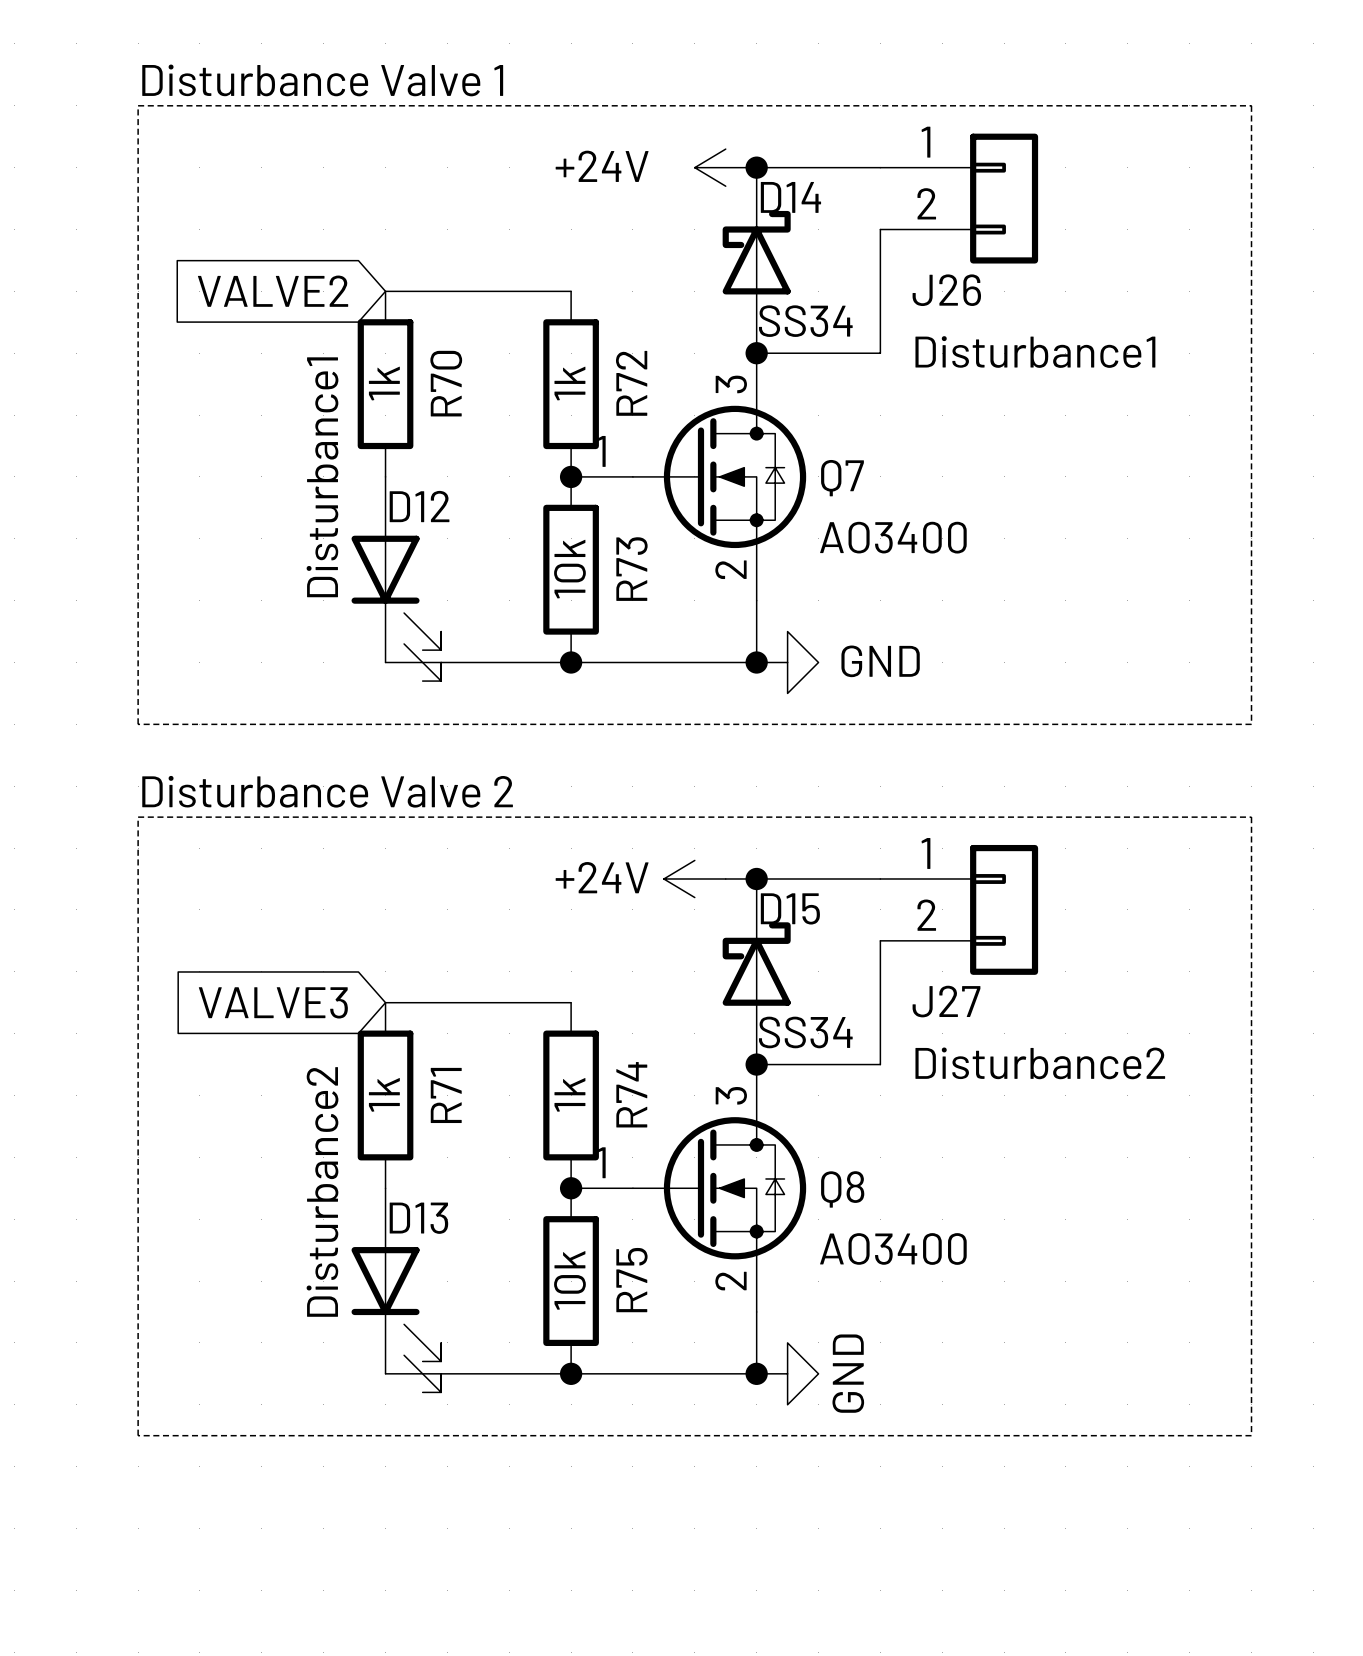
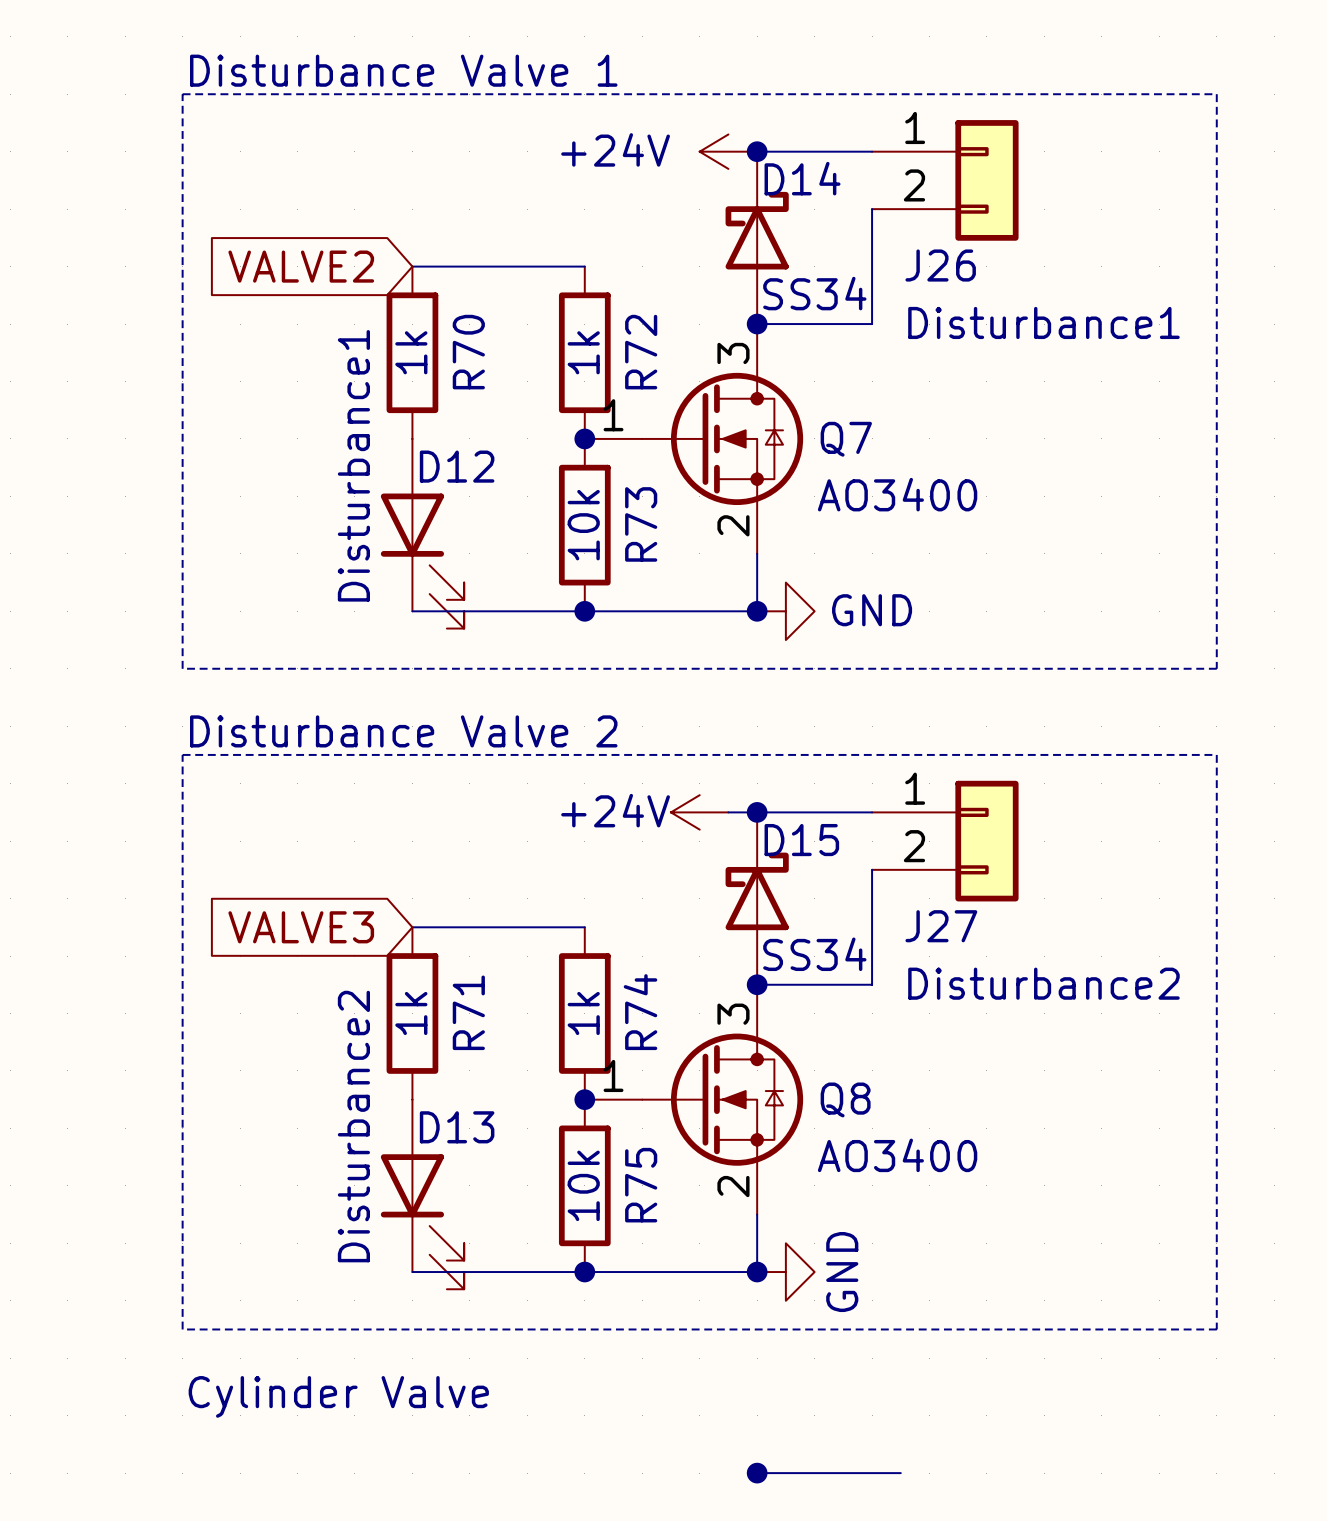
text: none -> Cylinder Valve (338, 1396)
wire: none -> (757, 1473) (900, 1473)
junction: none -> (757, 1473)

